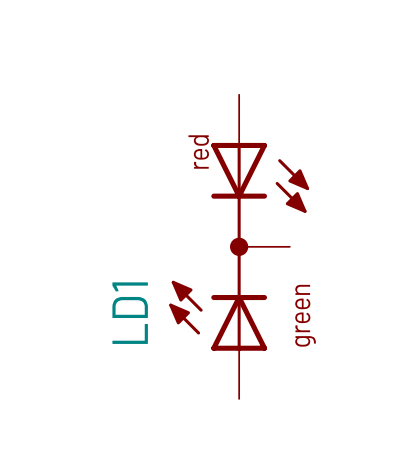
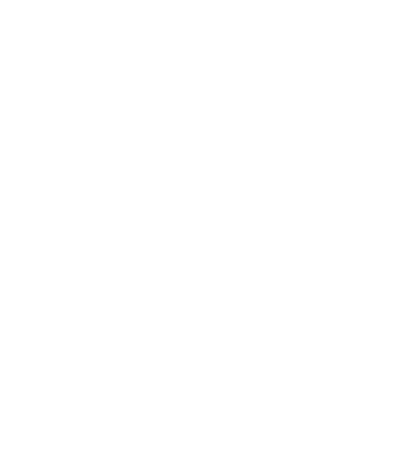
LD1: (239, 246) -> none

